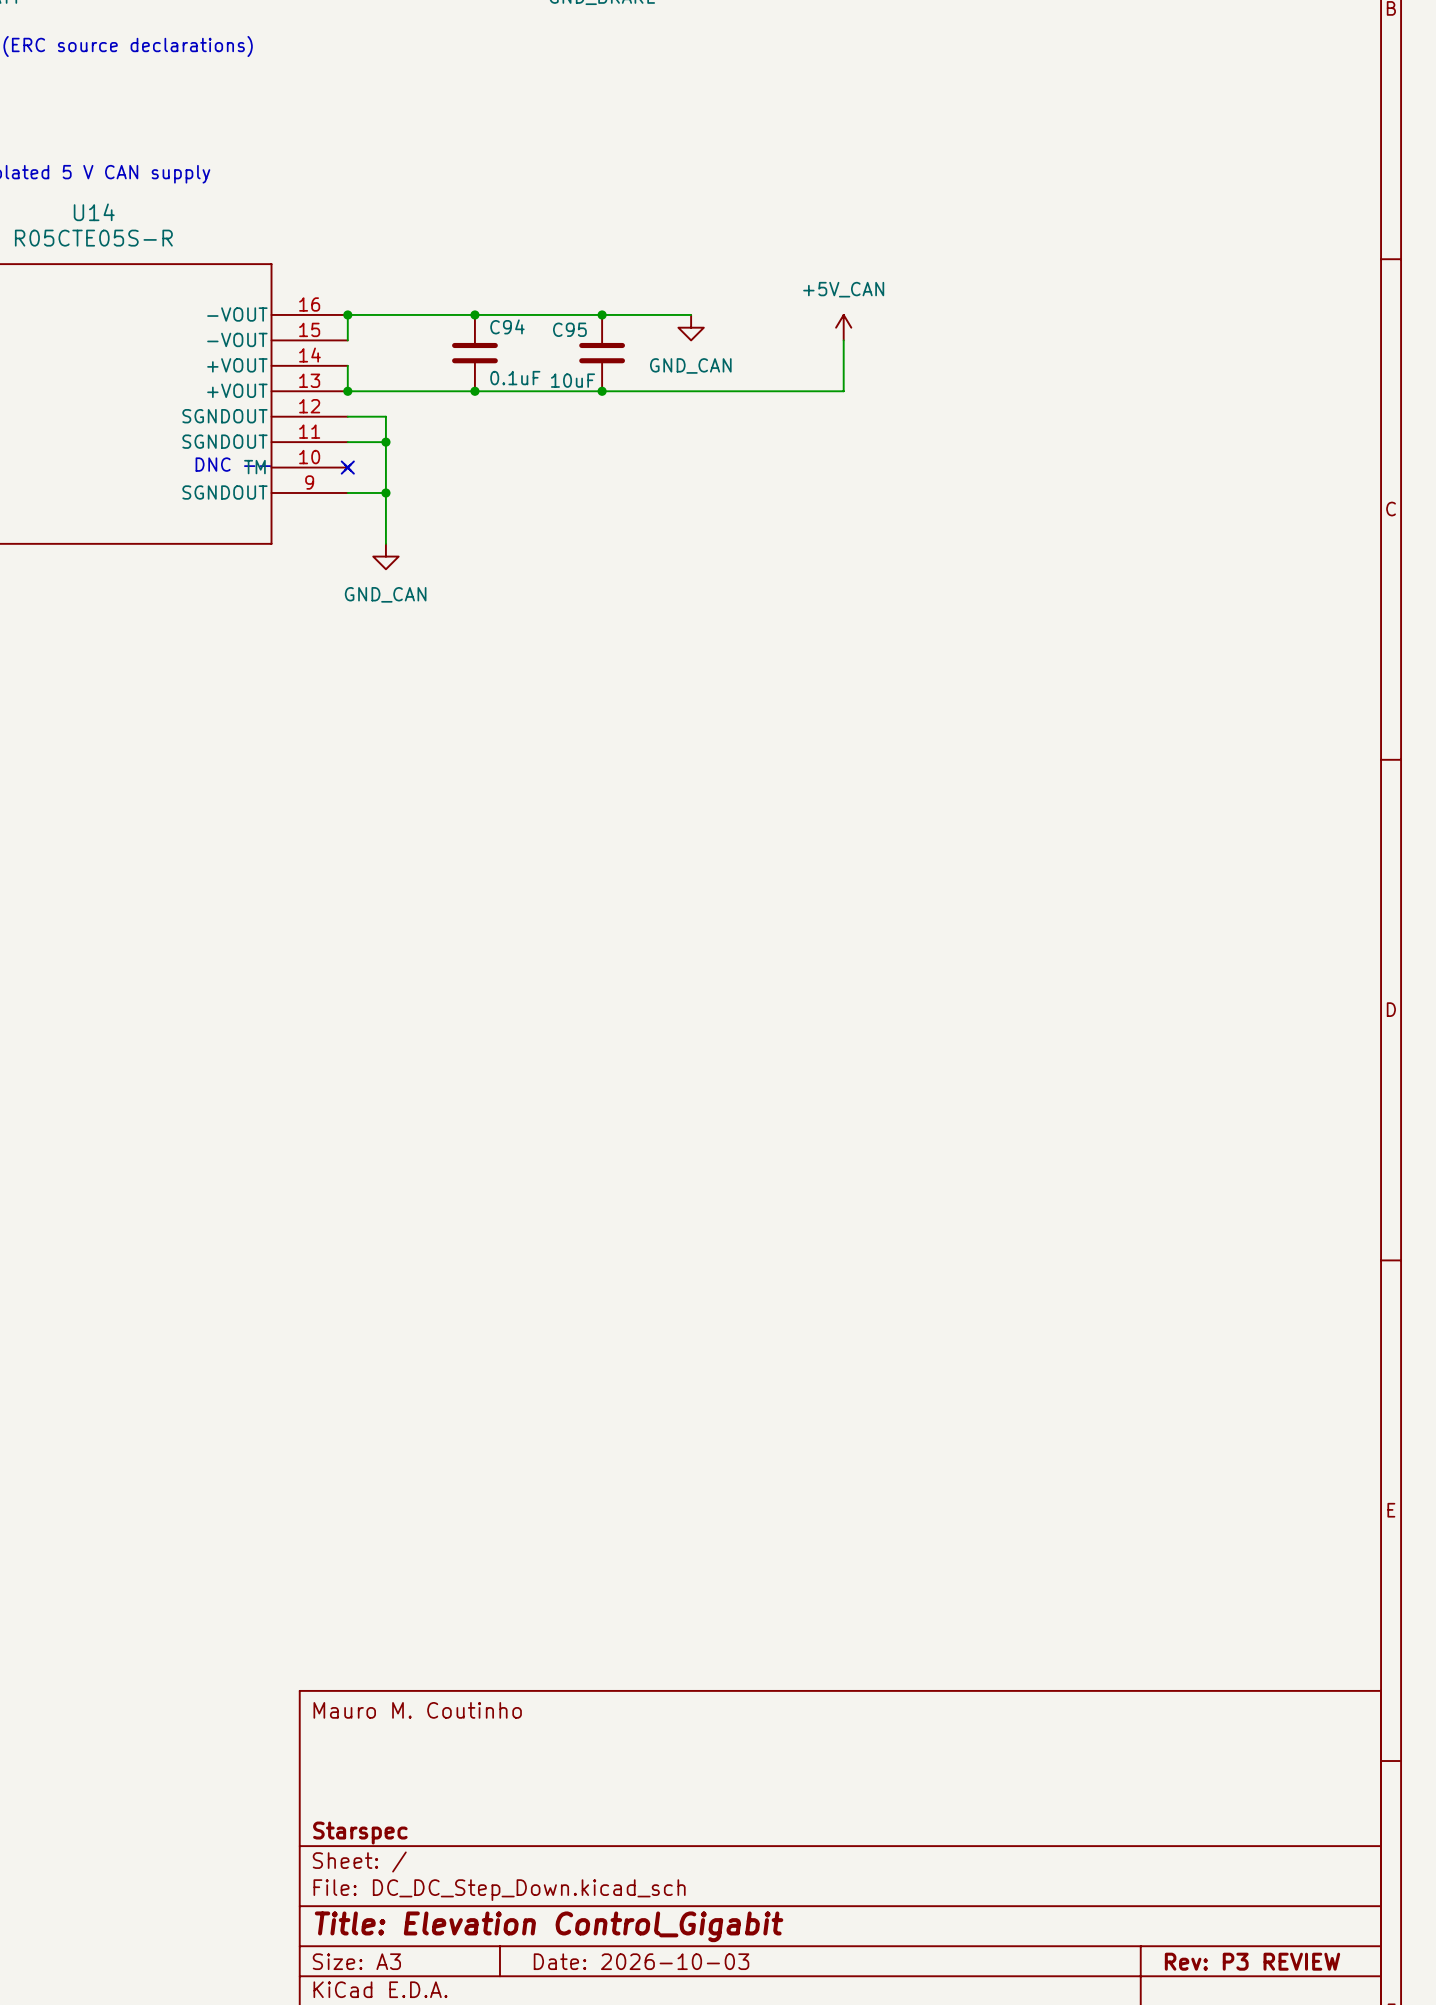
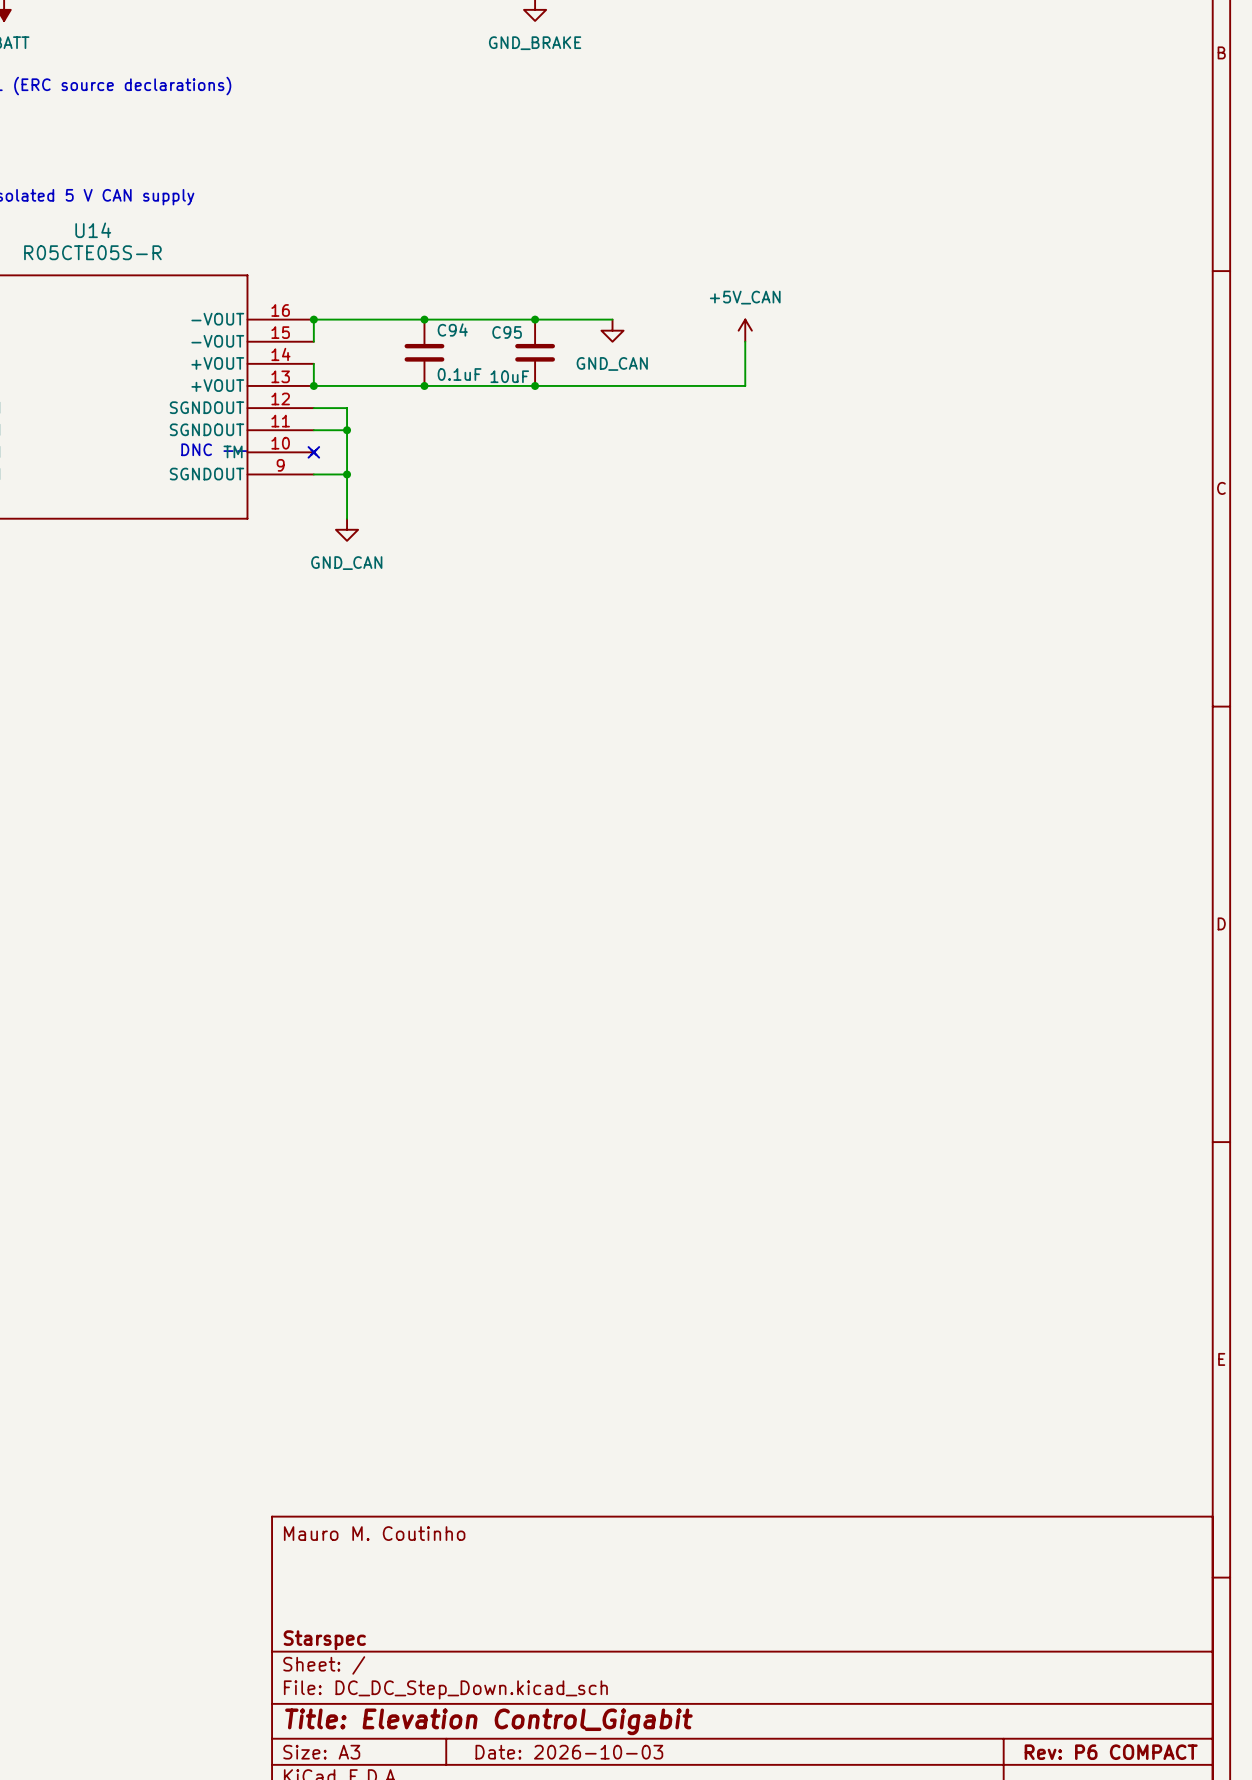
title block: Rev: P3 REVIEW (1252, 1961) -> Rev: P6 COMPACT (1111, 1752)

